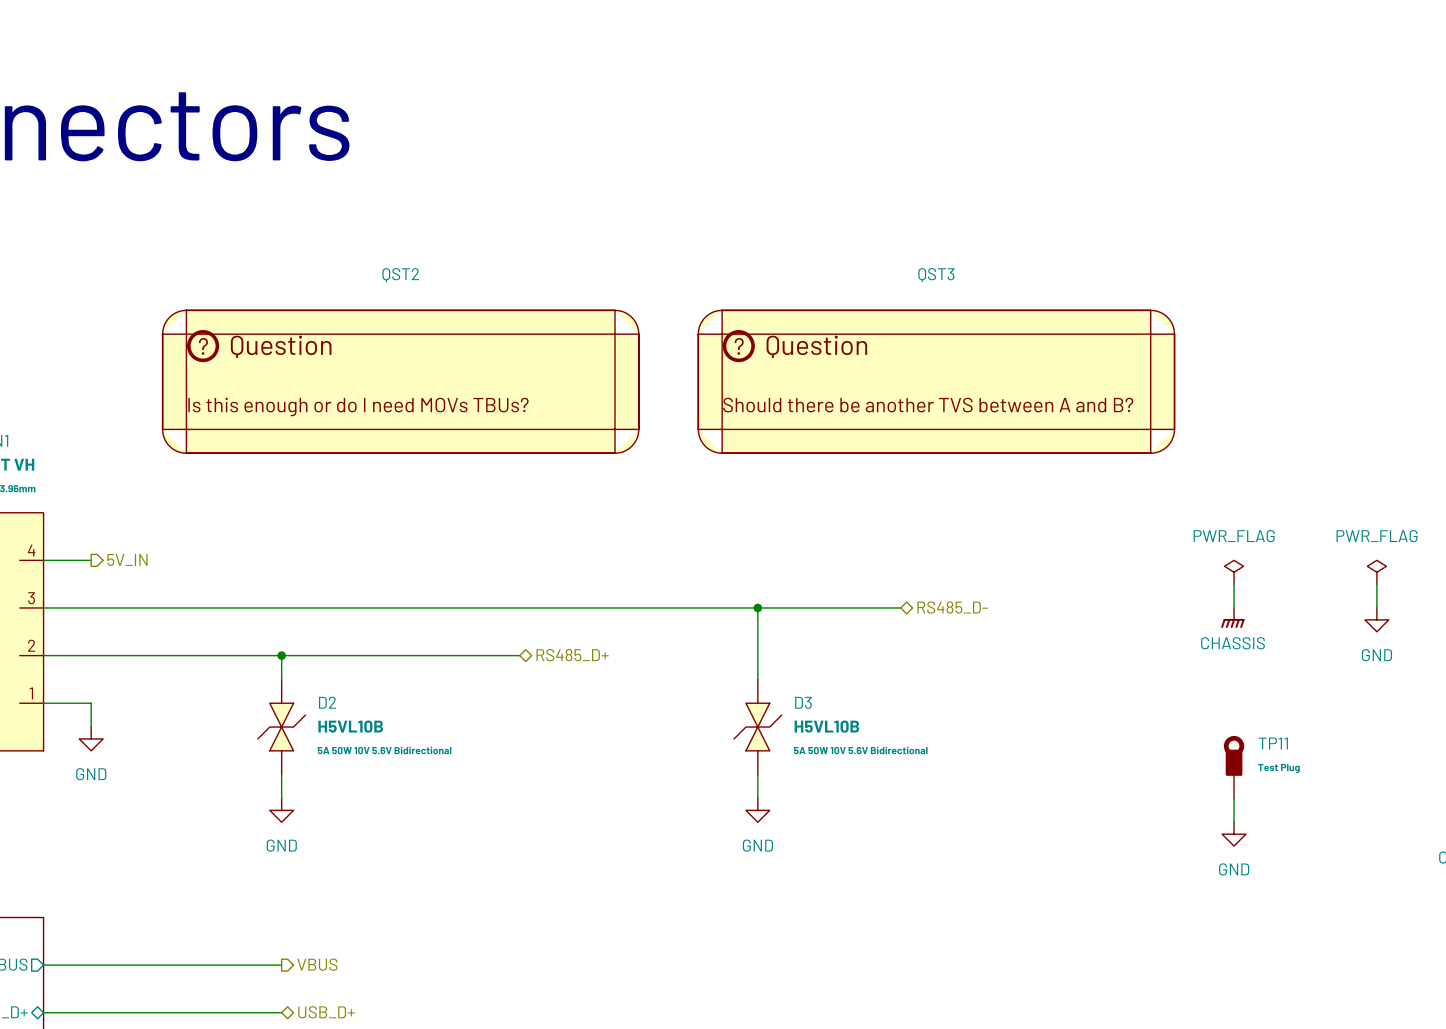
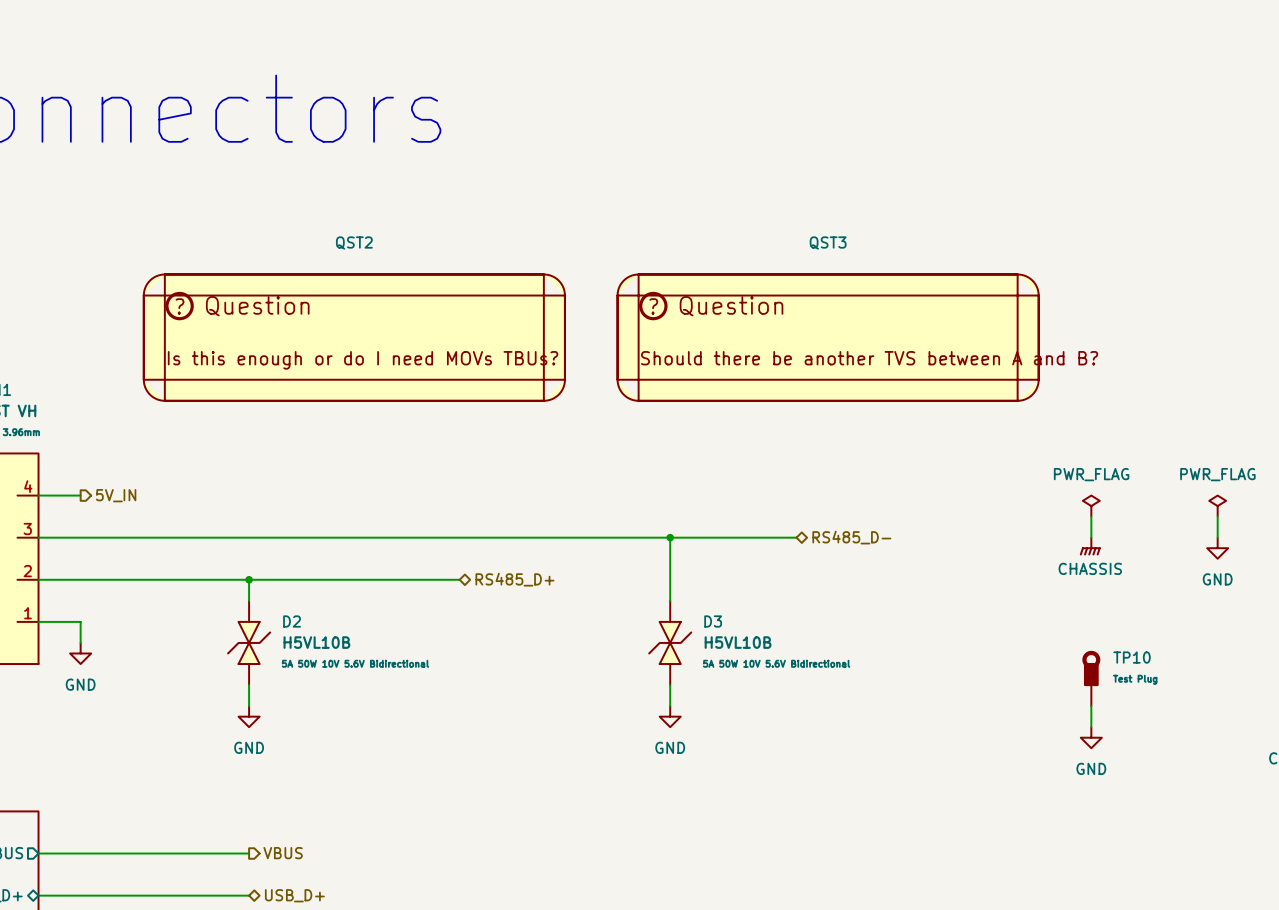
TP11 name: TP11 (1273, 743) -> TP10 (1132, 657)

